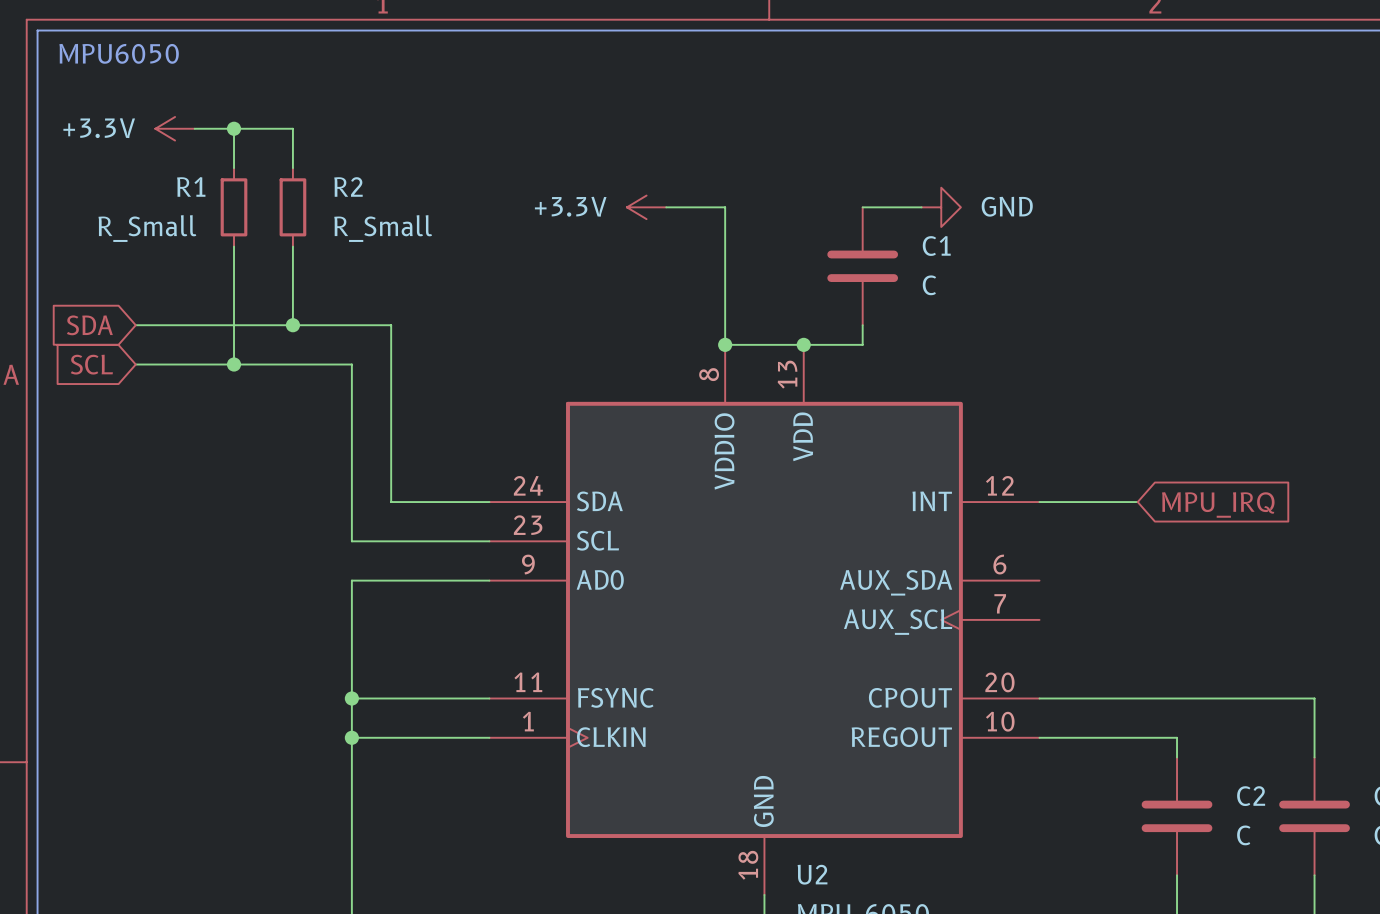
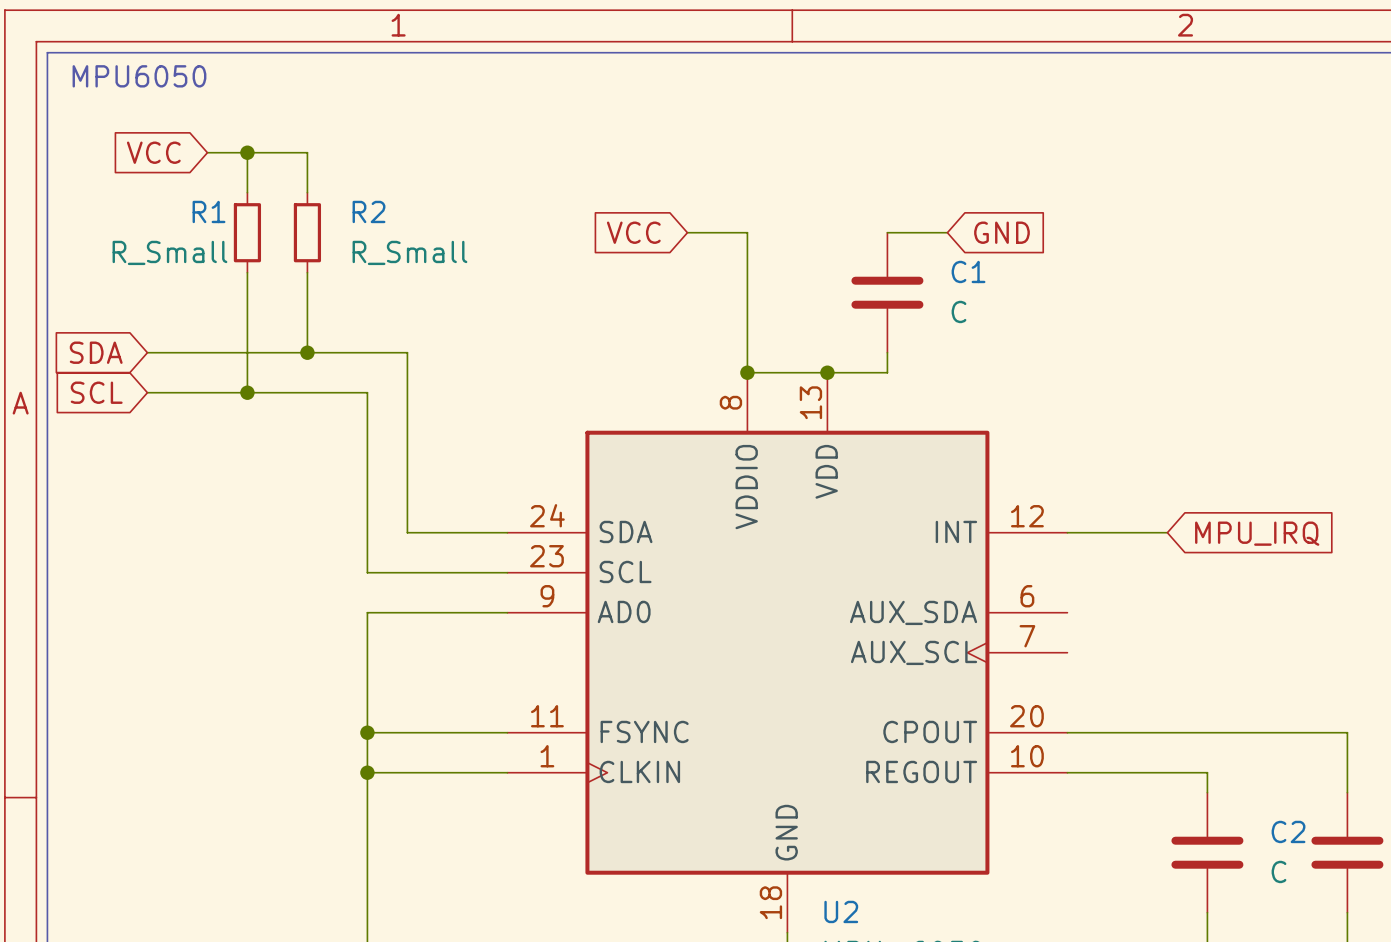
global label: none -> VCC (153, 152)
power symbol: +3.3V (175, 128) -> none
global label: none -> VCC (633, 232)
power symbol: +3.3V (646, 207) -> none
power symbol: GND (941, 207) -> none
global label: none -> GND (1001, 232)

